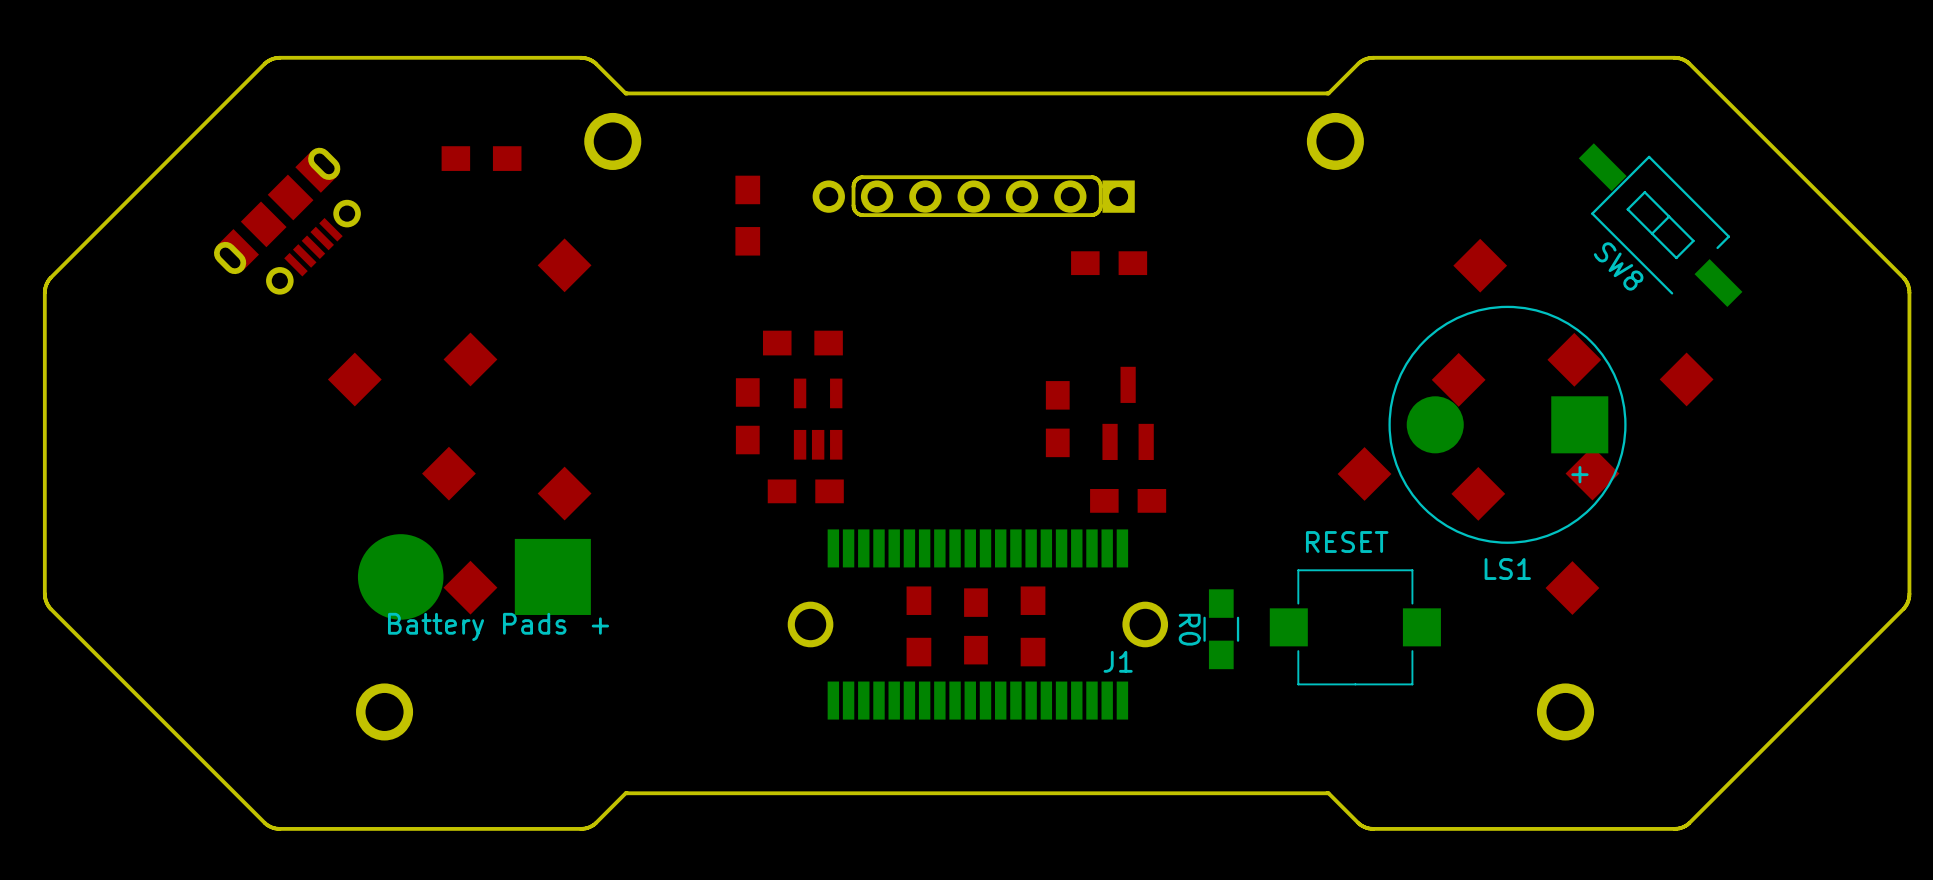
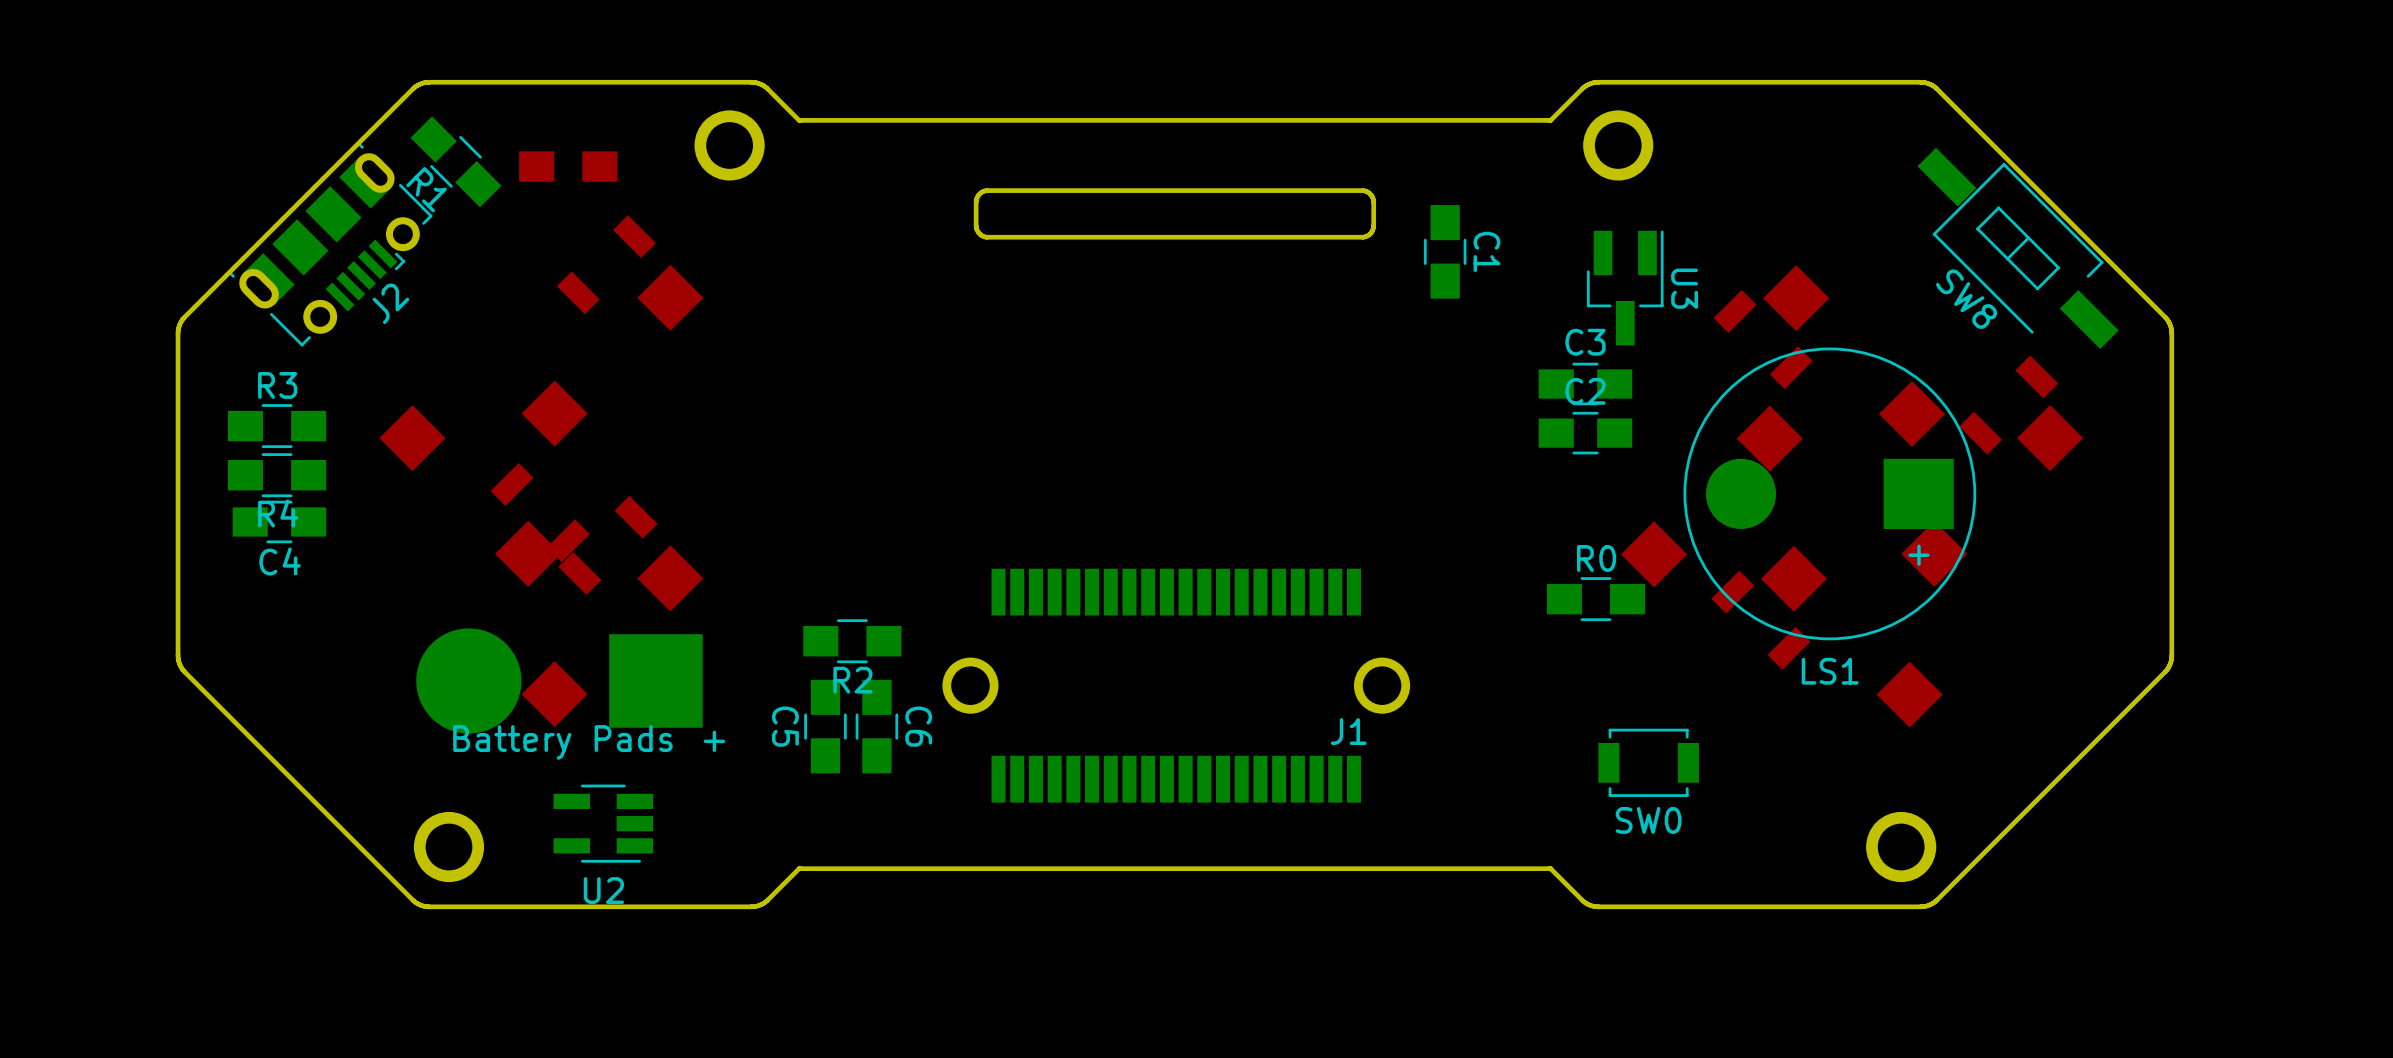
board edge: (1674, 57) (1689, 63) (1903, 278) (1909, 292) (1909, 593) (1907, 602) (1689, 823) (1681, 827) (1370, 828) (1358, 823) (1328, 793) (625, 793) (595, 823) (583, 828) (277, 828) (265, 823) (50, 608) (45, 600) (44, 292) (46, 283) (265, 63) (272, 58) (583, 57) (595, 63) (625, 93) (1328, 93) (1358, 63) (1370, 57) (1674, 57) -> (1923, 82) (1936, 88) (2165, 317) (2170, 326) (2171, 333) (2171, 655) (2169, 665) (1936, 900) (1927, 905) (1596, 906) (1582, 900) (1550, 868) (799, 868) (767, 900) (753, 906) (426, 906) (413, 900) (184, 671) (179, 662) (178, 333) (180, 323) (413, 88) (421, 83) (753, 82) (767, 88) (799, 120) (1550, 120) (1582, 88) (1596, 82) (1923, 82)
board edge: (1092, 177) (862, 177) (856, 179) (853, 184) (853, 207) (856, 212) (862, 215) (1092, 215) (1097, 212) (1100, 205) (1100, 184) (1097, 179) (1092, 177) -> (1363, 190) (1369, 193) (1373, 202) (1373, 228) (1369, 234) (1363, 237) (986, 237) (980, 234) (976, 225) (976, 199) (980, 193) (986, 190) (1363, 190)
part: (973, 196) -> none
R1 side: top (747, 215) -> bottom (456, 161)
J2 side: top (287, 221) -> bottom (330, 244)
part: none -> (606, 264)
C1 side: top (1109, 263) -> bottom (1445, 251)
part: none -> (1763, 339)
R2 side: top (802, 343) -> bottom (852, 641)
part: none -> (2008, 405)
R3: none -> (277, 426)
R4: none -> (277, 475)
U3 side: top (1128, 413) -> bottom (1625, 288)
C5 side: top (747, 416) -> bottom (825, 726)
U2 side: top (818, 419) -> bottom (603, 823)
C2 side: top (1057, 419) -> bottom (1585, 433)
part: none -> (540, 512)
C4: none -> (279, 521)
part: none -> (608, 545)
C6 side: top (805, 491) -> bottom (876, 726)
C3 side: top (1128, 500) -> bottom (1585, 383)
part: none -> (1760, 620)
J1 position: (977, 624) -> (1176, 685)
part: (918, 626) -> none
part: (975, 626) -> none
part: (1033, 626) -> none
part: RESET (1355, 627) -> none
R0 rotation: 0° (1221, 629) -> 90° clockwise (1596, 599)
R0 position: (1221, 629) -> (1596, 599)
SW0: none -> (1648, 762)

